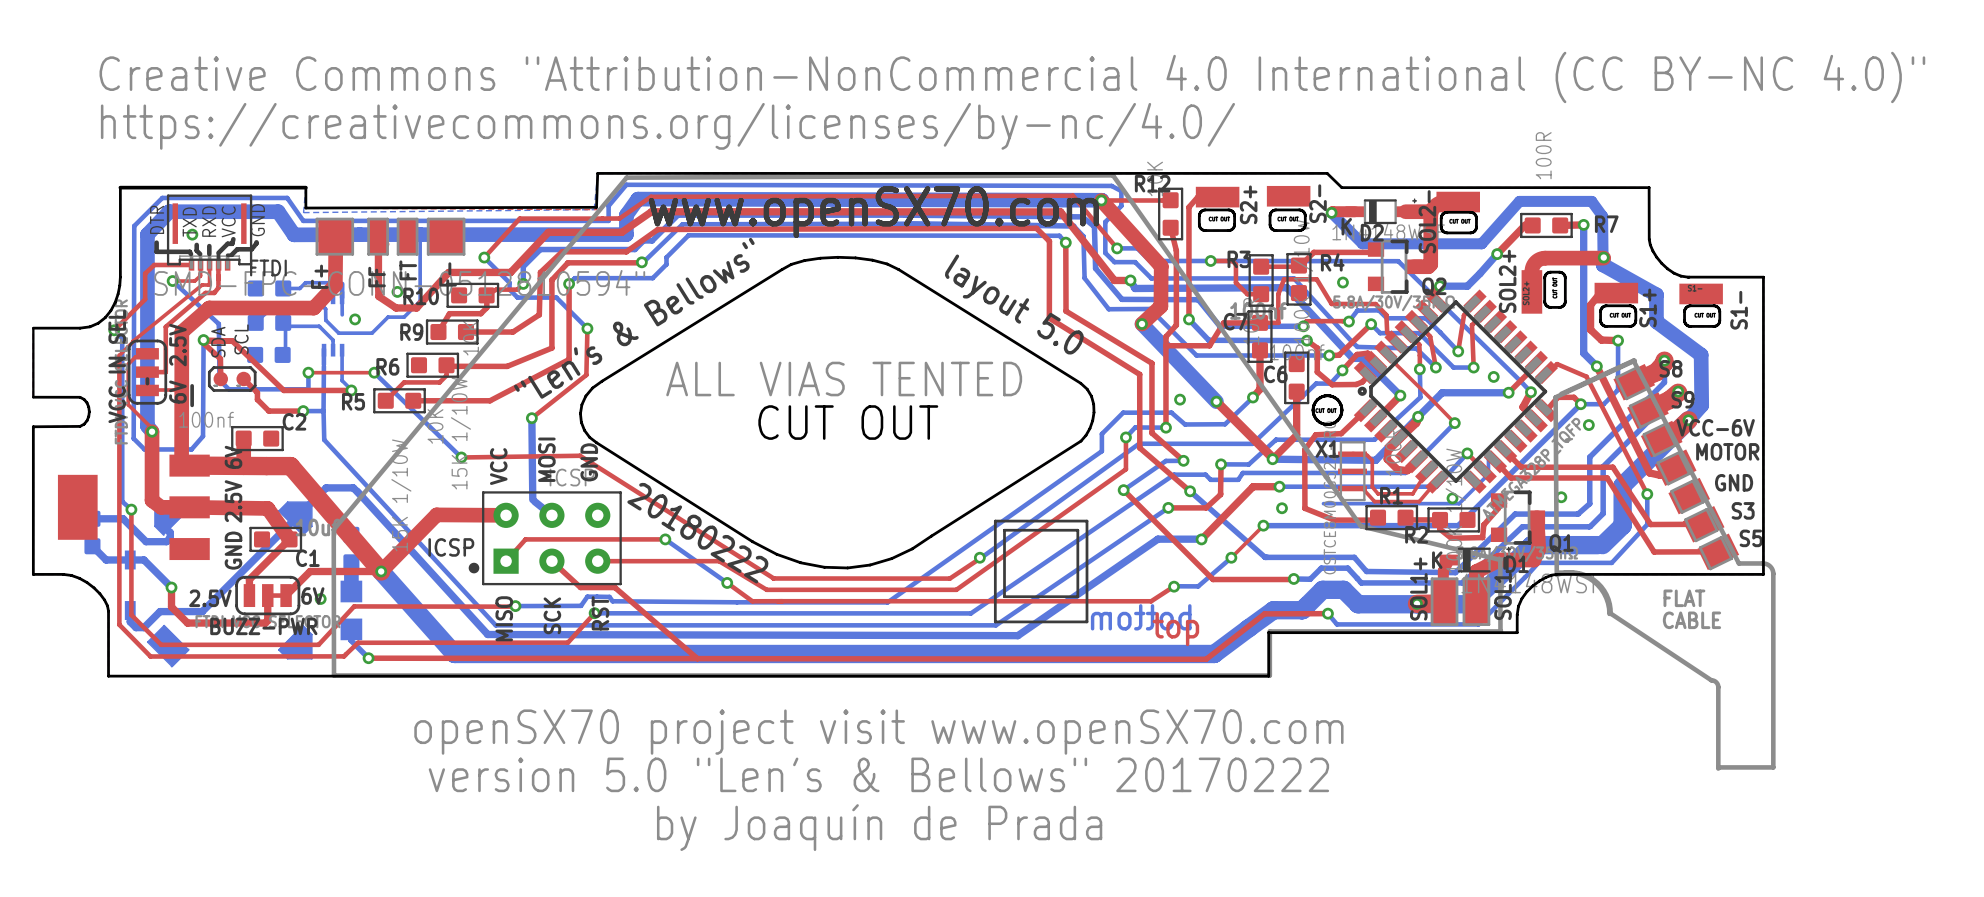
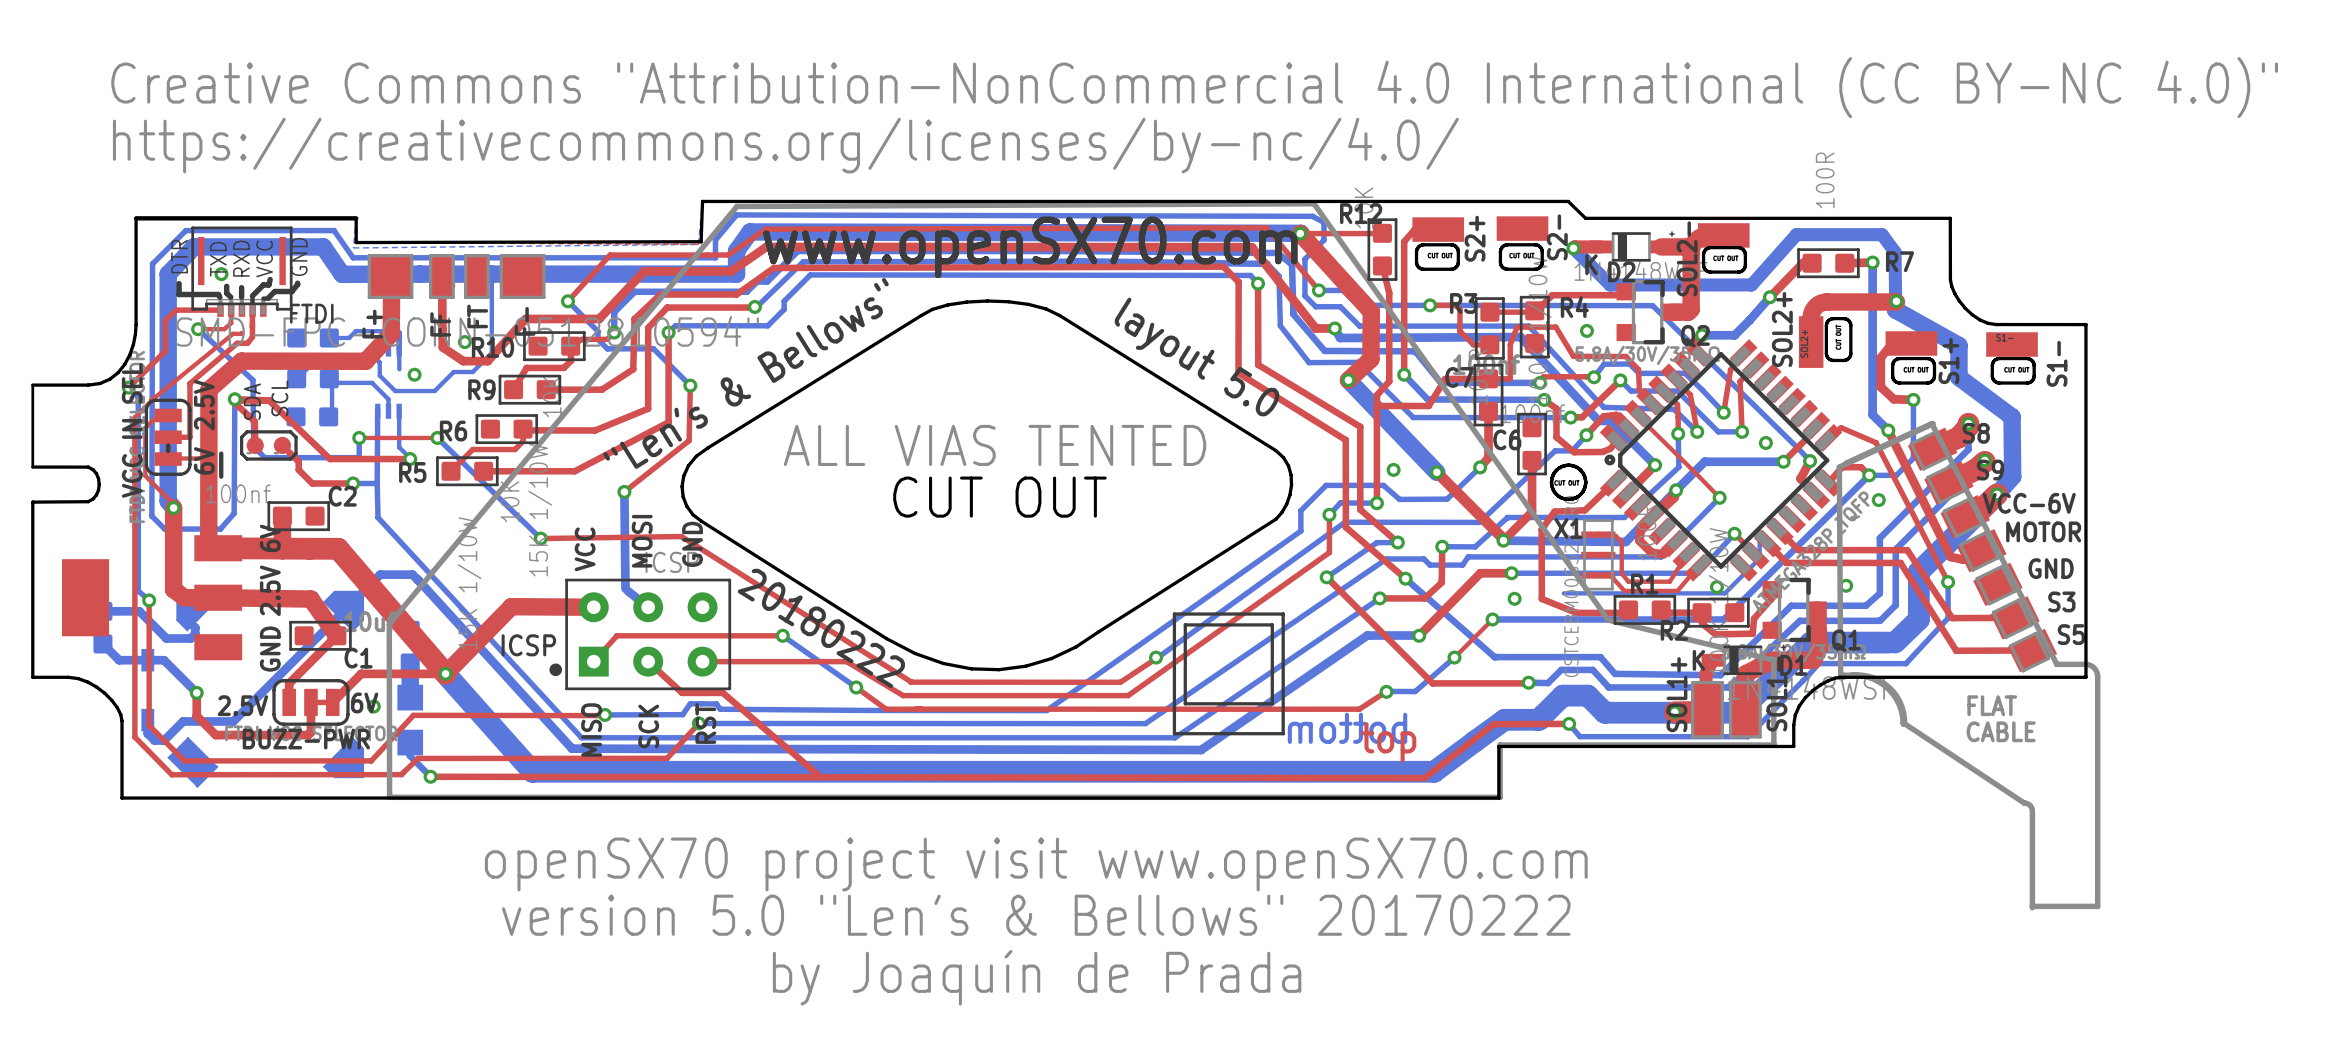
top track: (209, 265) (209, 284) -> none

